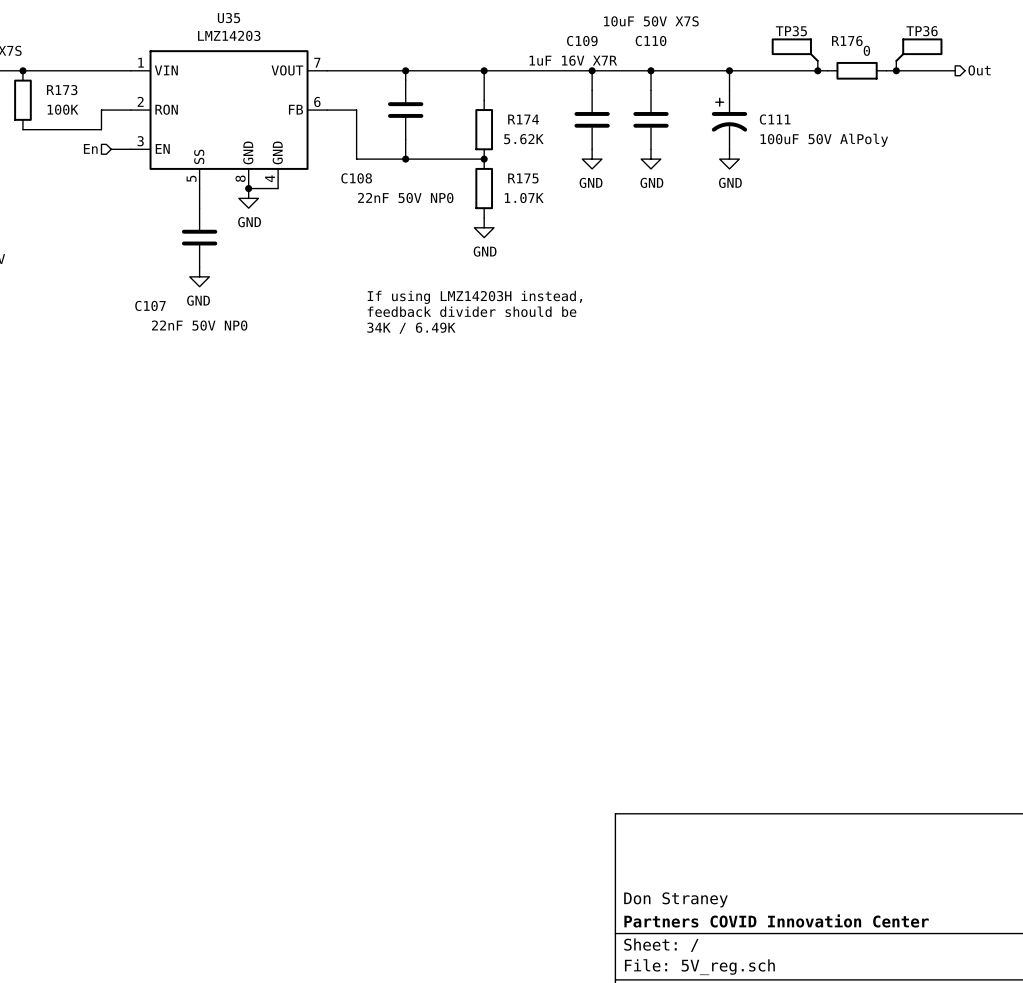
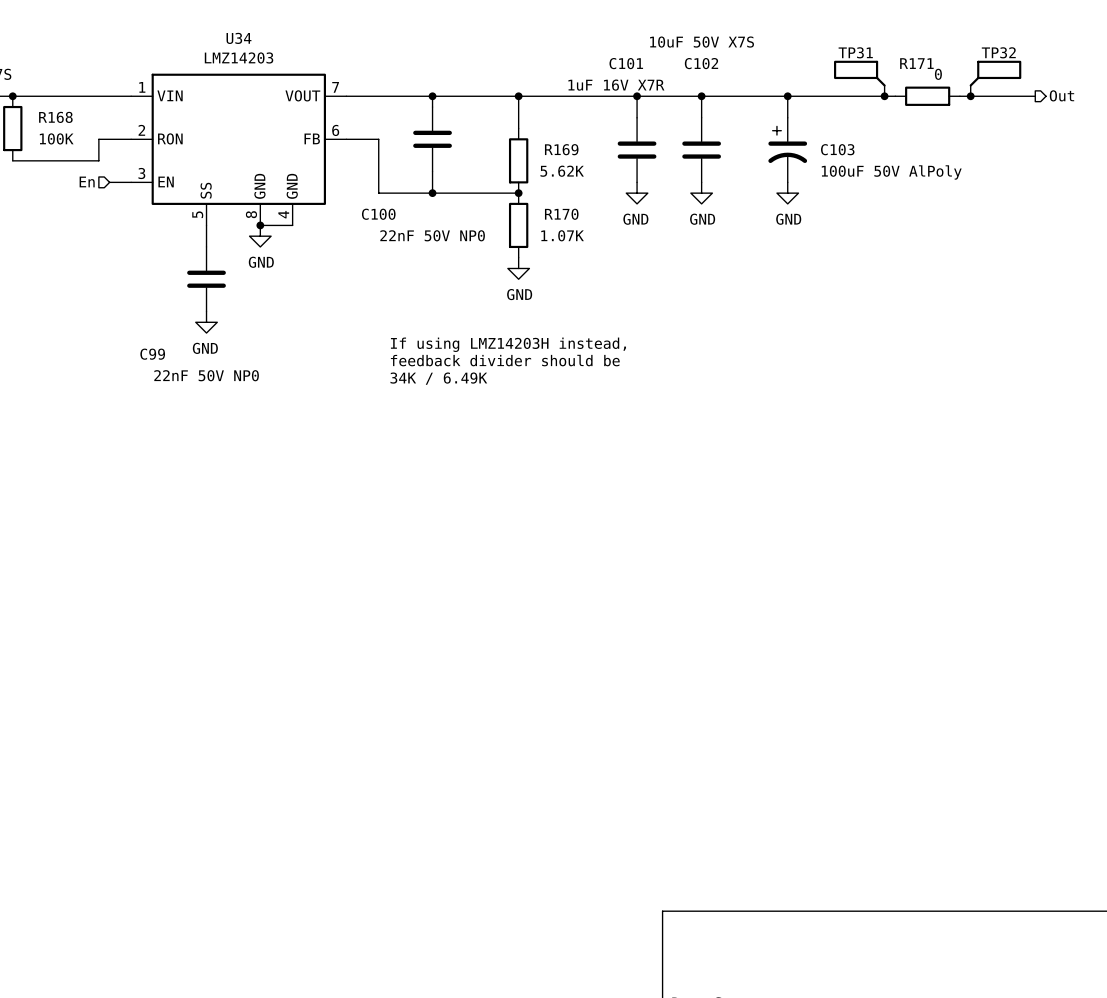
U35 name: U35 (228, 18) -> U34 (238, 38)
TP35 name: TP35 (791, 31) -> TP31 (855, 52)
TP36 name: TP36 (922, 31) -> TP32 (998, 52)
C109 name: C109 (582, 40) -> C101 (626, 63)
C110 name: C110 (651, 40) -> C102 (701, 63)
R176 name: R176 (847, 40) -> R171 (916, 63)
R173 name: R173 (62, 90) -> R168 (55, 117)
R174 name: R174 (523, 119) -> R169 (561, 149)
C111 name: C111 (775, 119) -> C103 (837, 149)
C108 name: C108 (356, 178) -> C100 (378, 214)
R175 name: R175 (523, 178) -> R170 (561, 214)
C107 name: C107 (150, 305) -> C99 (152, 354)

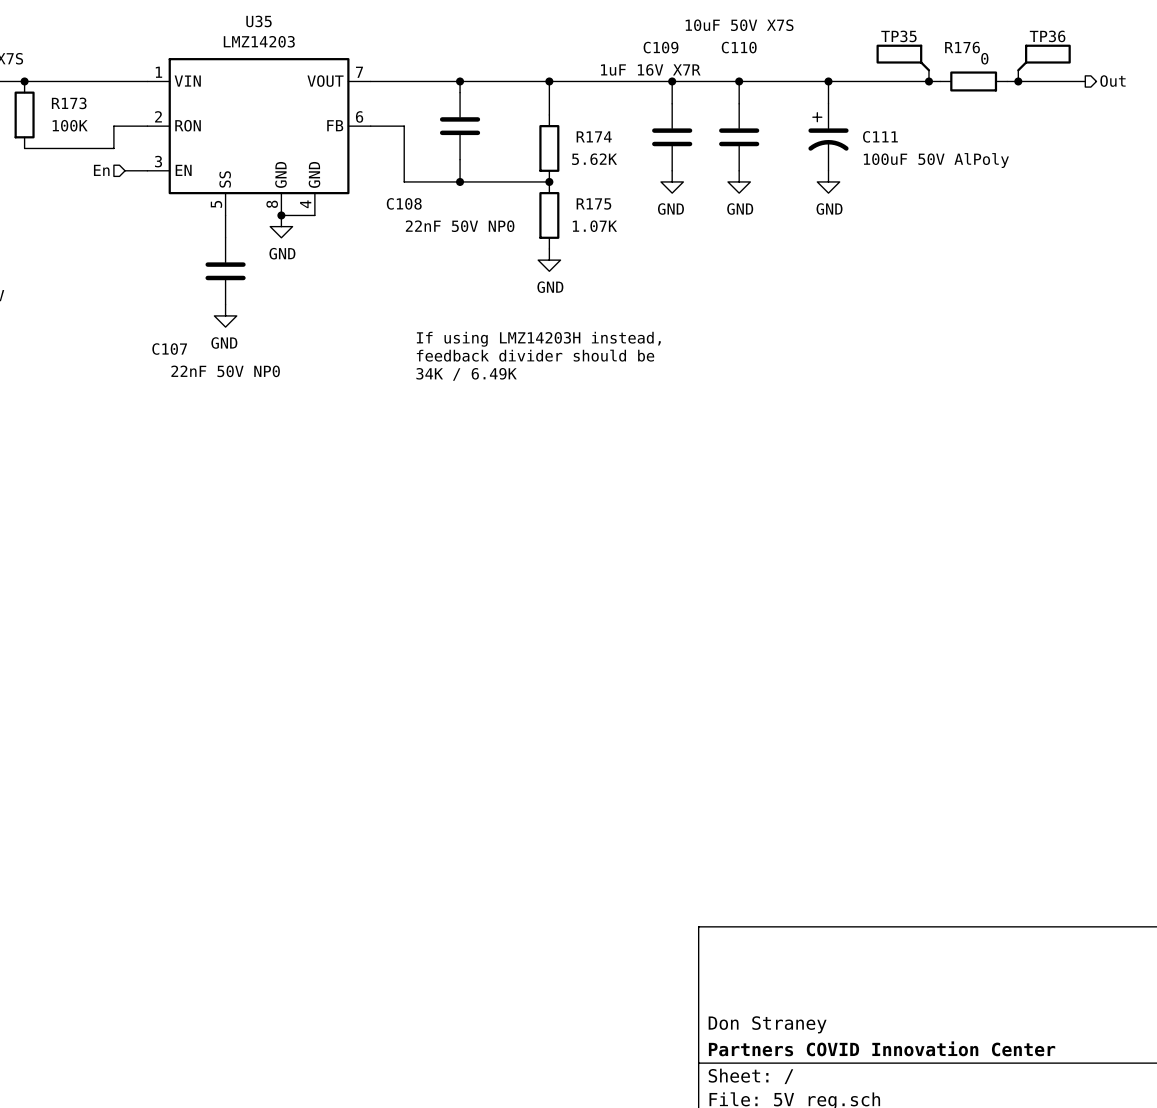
U34 name: U34 (238, 38) -> U35 (259, 21)
TP31 name: TP31 (855, 52) -> TP35 (898, 36)
TP32 name: TP32 (998, 52) -> TP36 (1047, 36)
C101 name: C101 (626, 63) -> C109 (661, 47)
C102 name: C102 (701, 63) -> C110 (739, 47)
R171 name: R171 (916, 63) -> R176 (962, 47)
R168 name: R168 (55, 117) -> R173 (69, 103)
R169 name: R169 (561, 149) -> R174 (594, 136)
C103 name: C103 (837, 149) -> C111 (880, 136)
C100 name: C100 (378, 214) -> C108 (404, 203)
R170 name: R170 (561, 214) -> R175 (593, 203)
C99 name: C99 (152, 354) -> C107 (169, 349)

